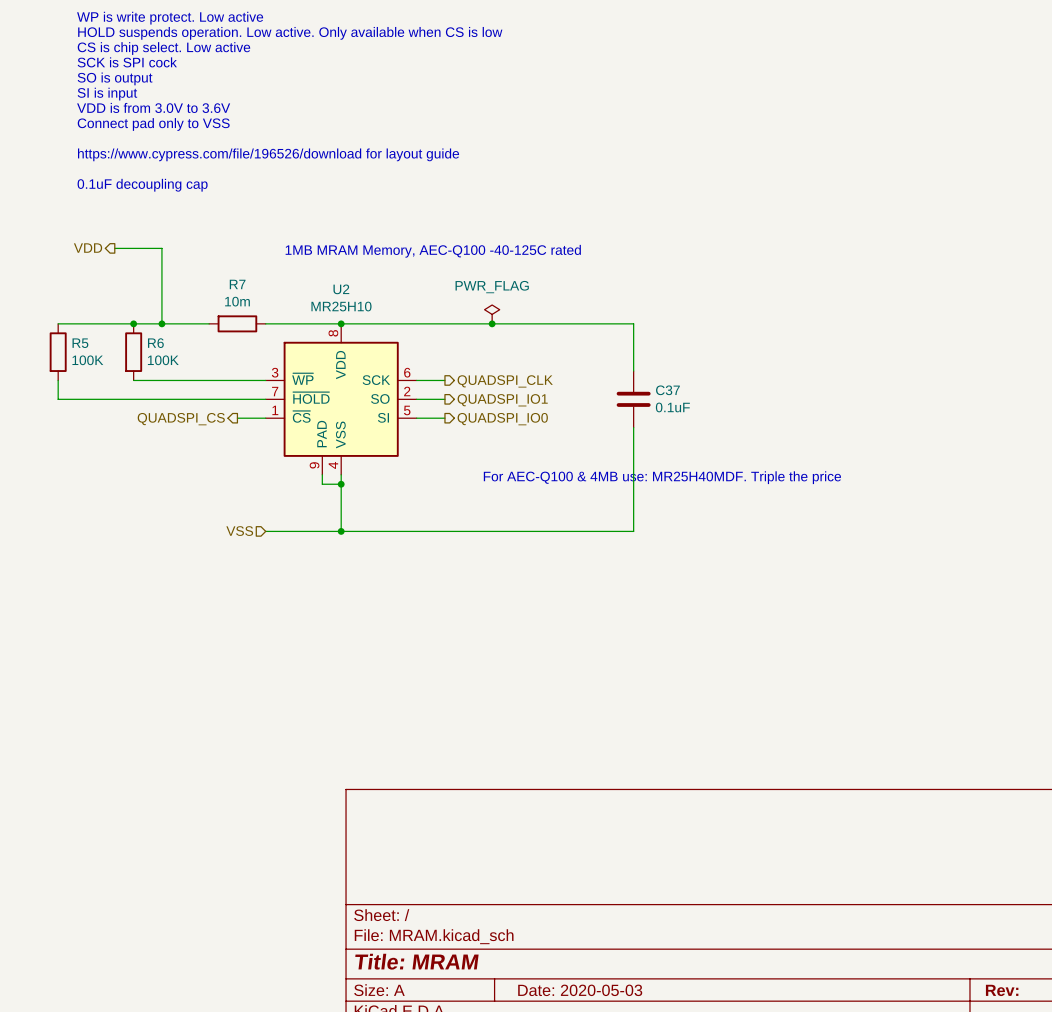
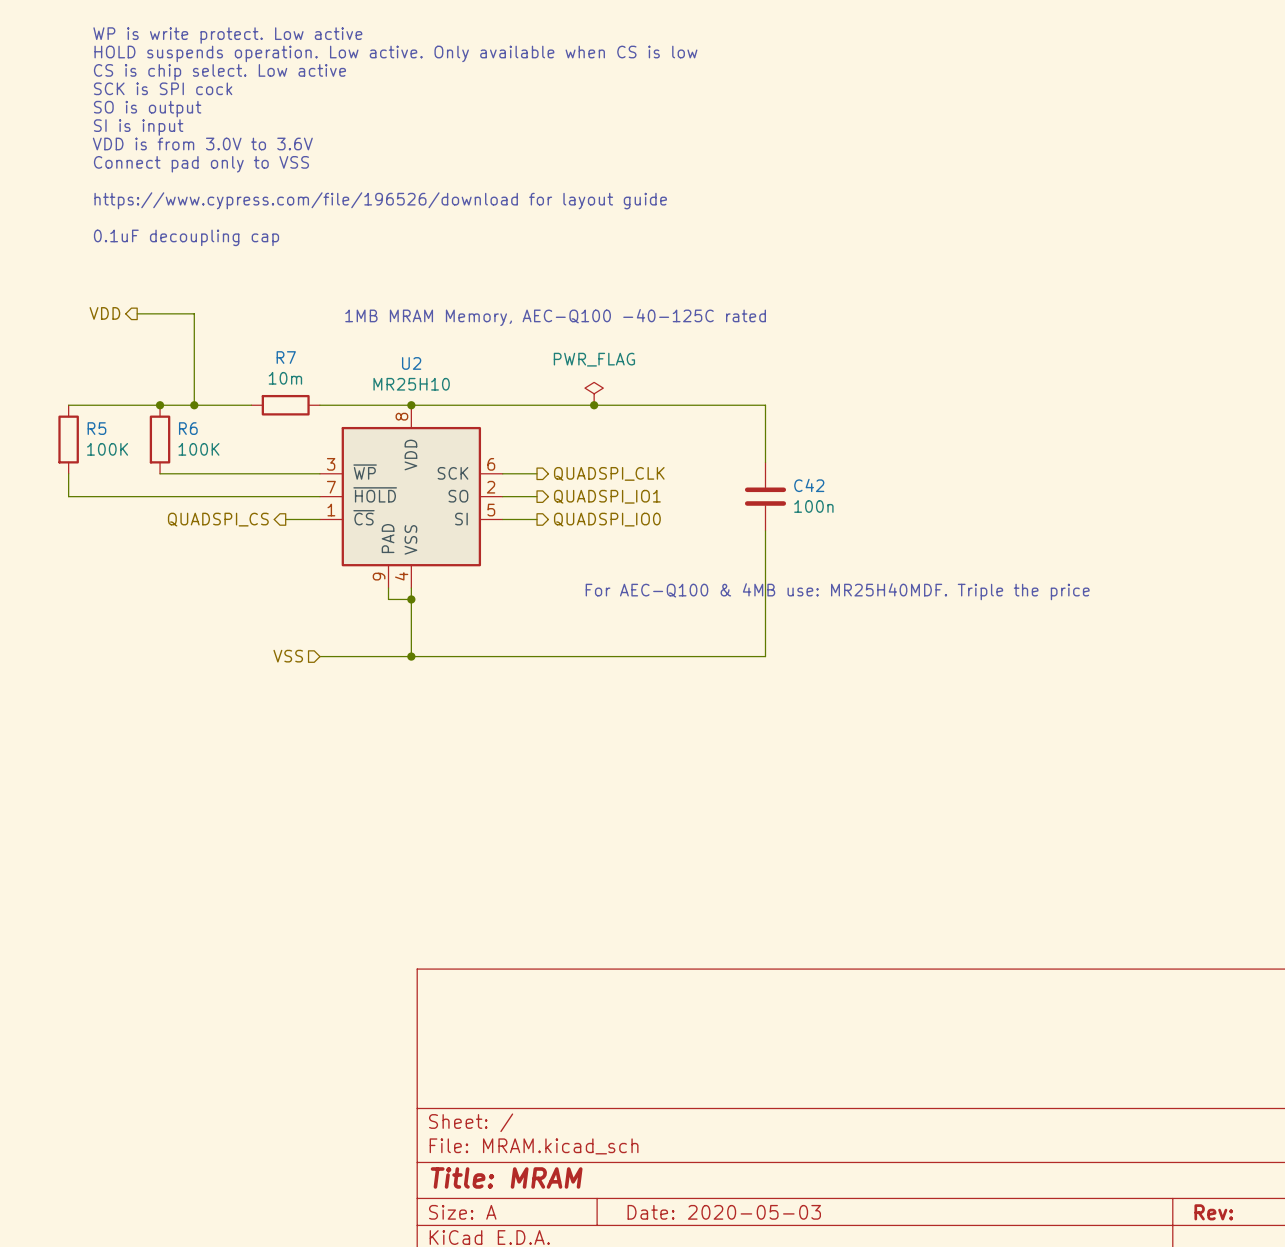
C37 name: C37 (667, 390) -> C42 (809, 485)
C37 value: 0.1uF (672, 407) -> 100n (813, 506)

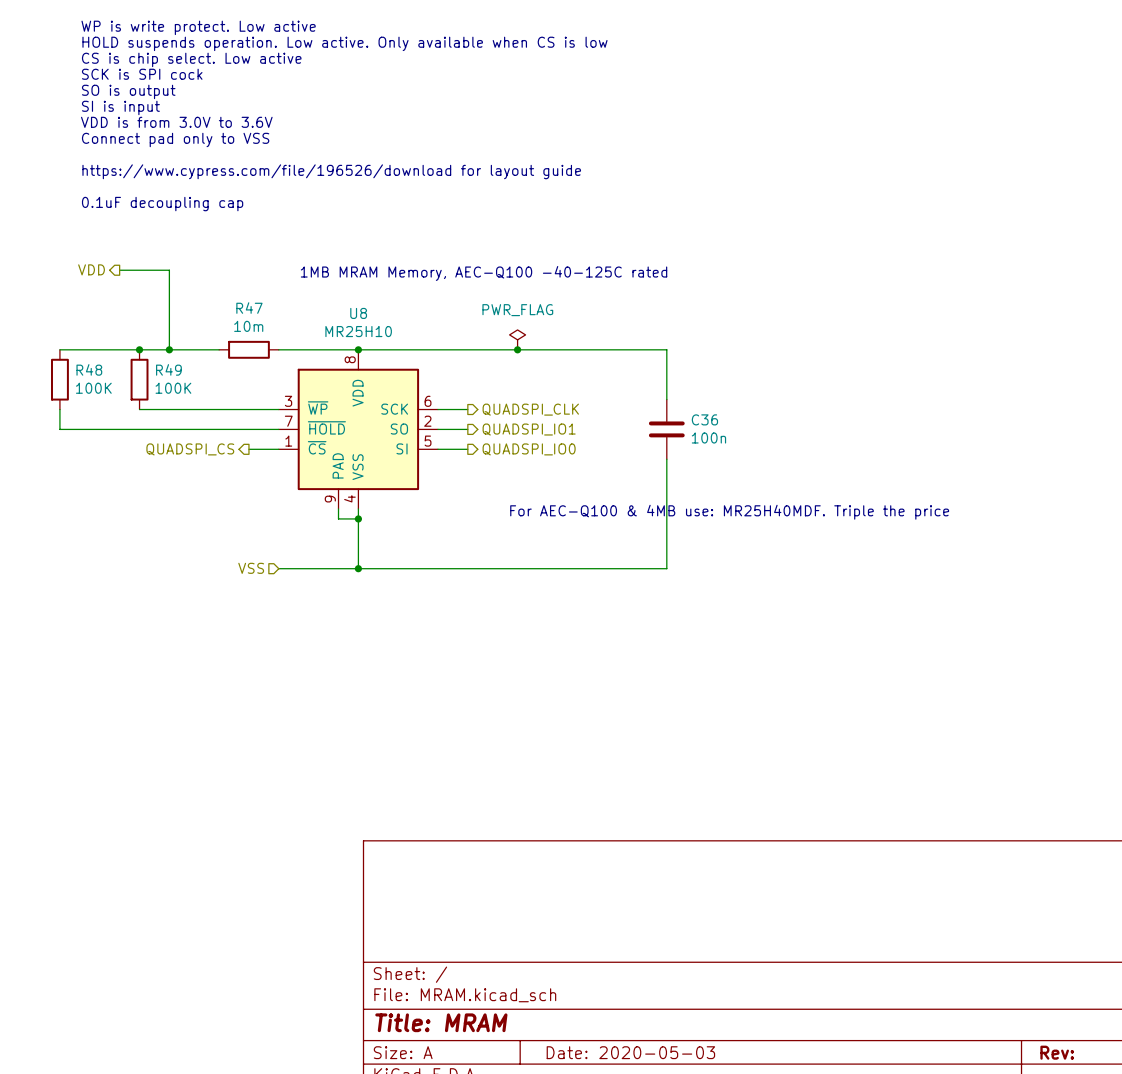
R7 name: R7 (286, 357) -> R47 (249, 308)
U2 name: U2 (411, 363) -> U8 (358, 313)
R5 name: R5 (96, 428) -> R48 (89, 369)
R6 name: R6 (188, 428) -> R49 (168, 369)
C42 name: C42 (809, 485) -> C36 (704, 419)

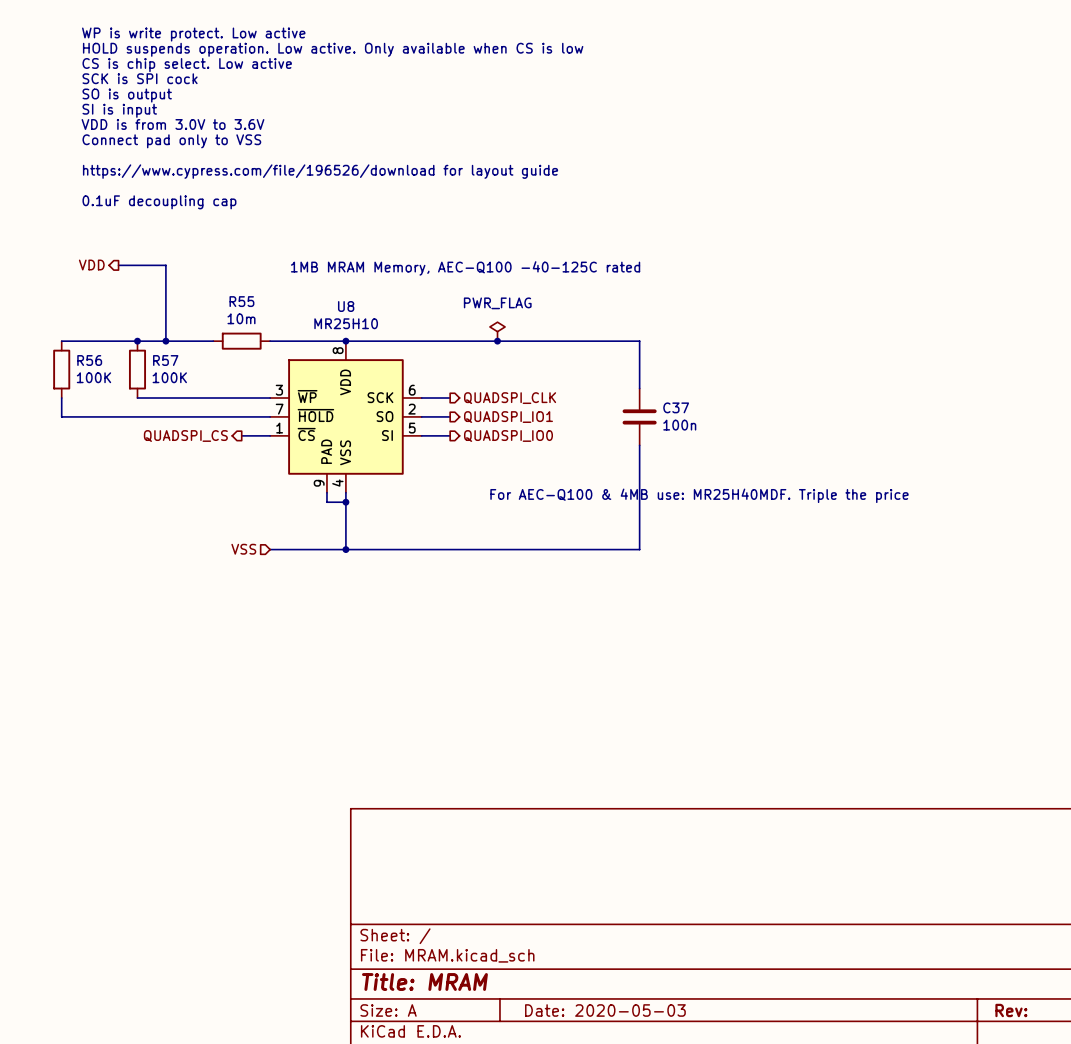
R47 name: R47 (249, 308) -> R55 (241, 301)
R48 name: R48 (89, 369) -> R56 (89, 360)
R49 name: R49 (168, 369) -> R57 (165, 360)
C36 name: C36 (704, 419) -> C37 (676, 407)

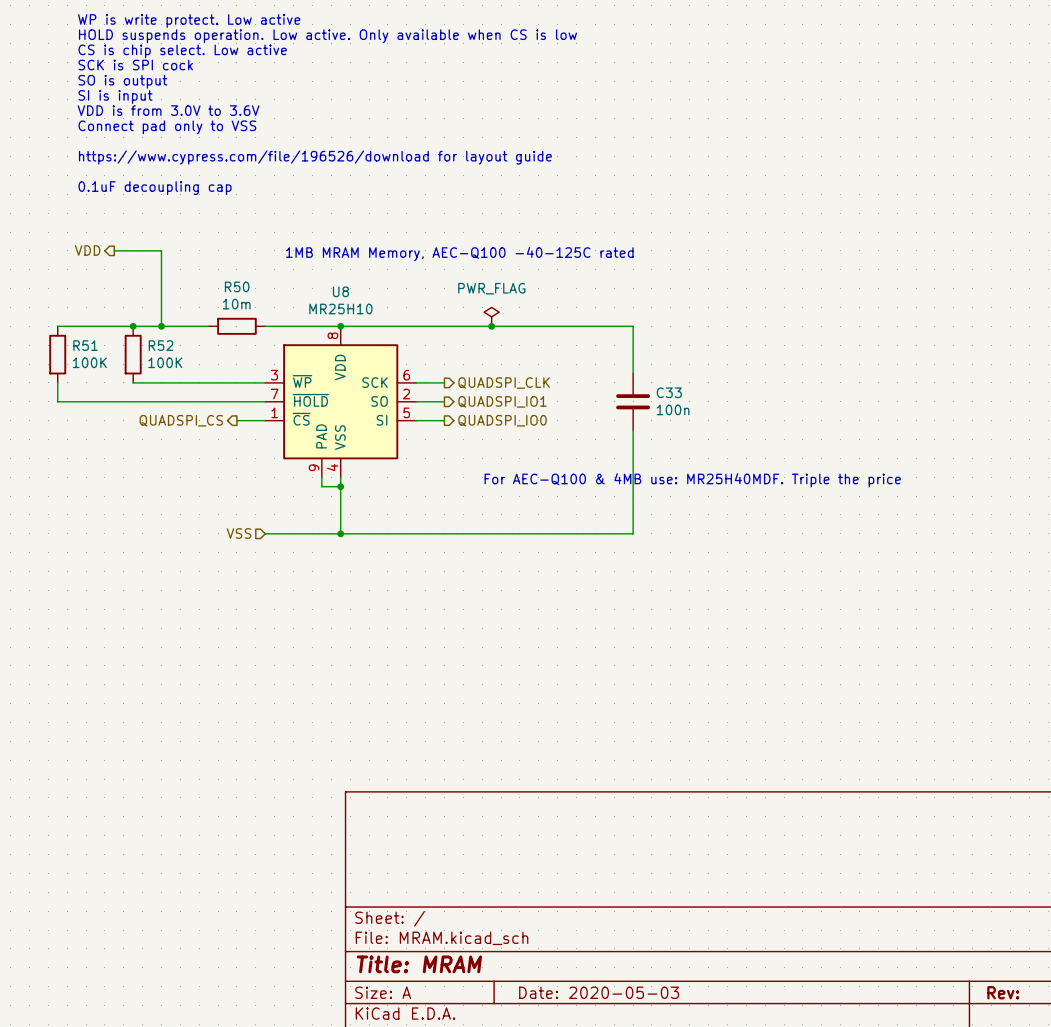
R55 name: R55 (241, 301) -> R50 (237, 286)
R56 name: R56 (89, 360) -> R51 (85, 345)
R57 name: R57 (165, 360) -> R52 (161, 345)
C37 name: C37 (676, 407) -> C33 (669, 392)

